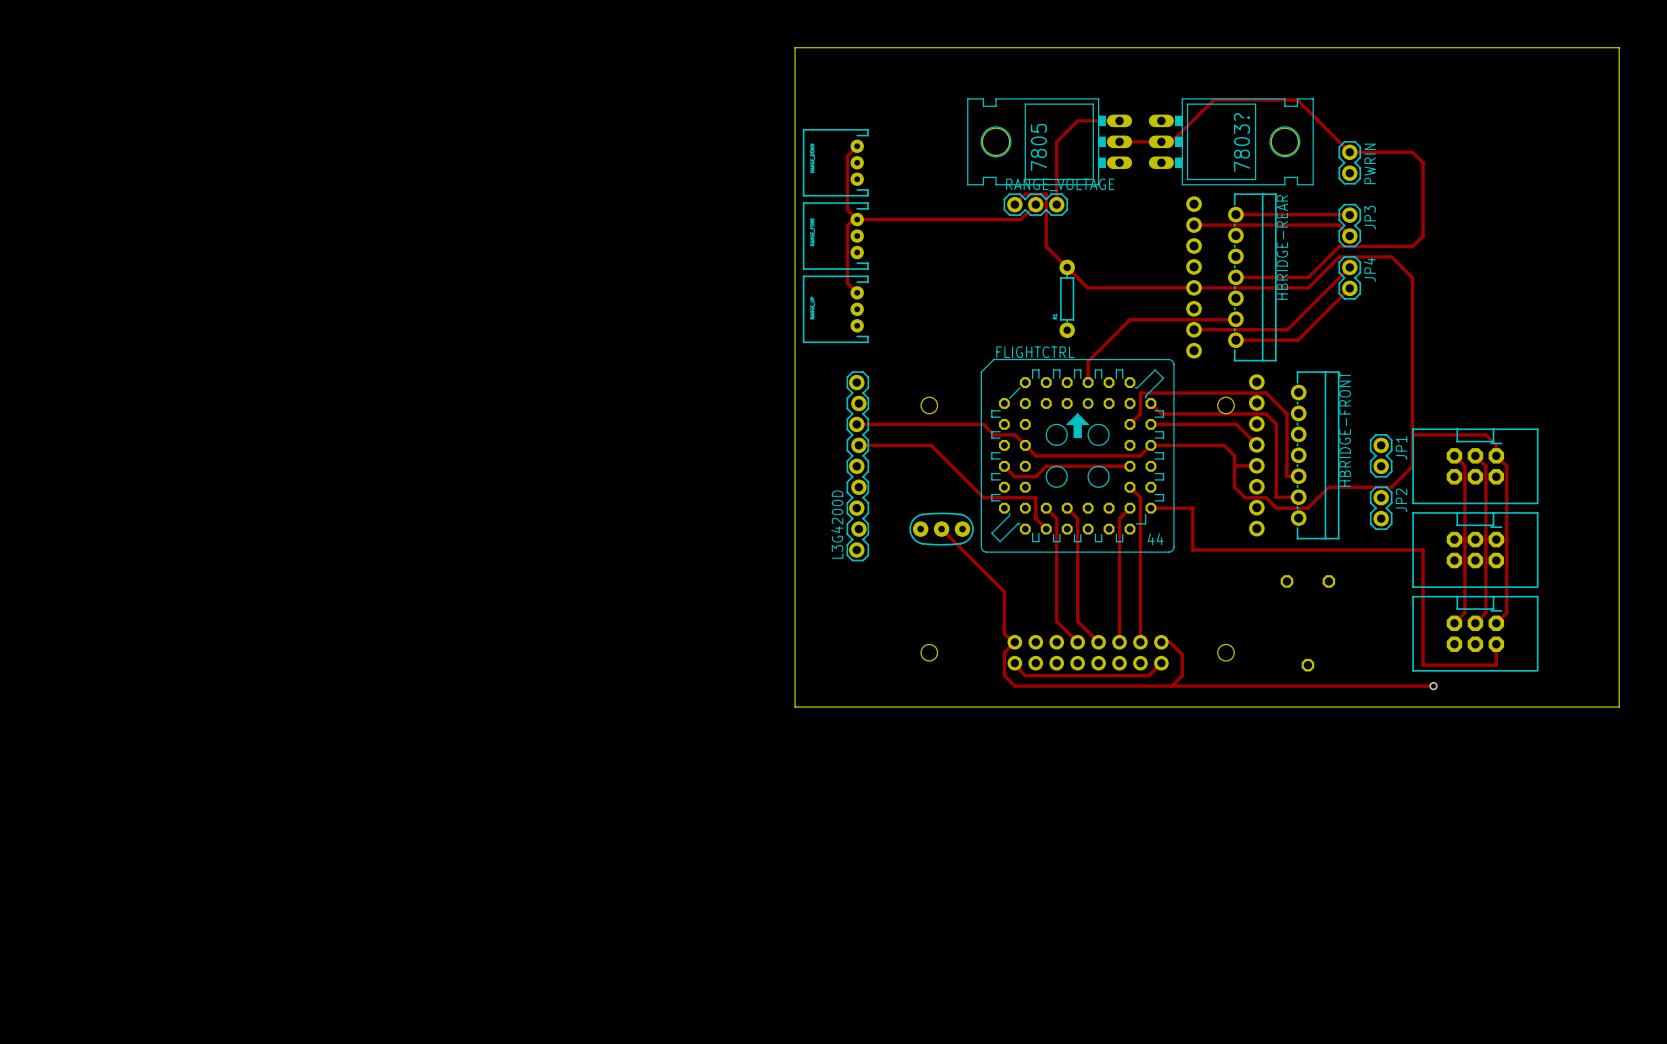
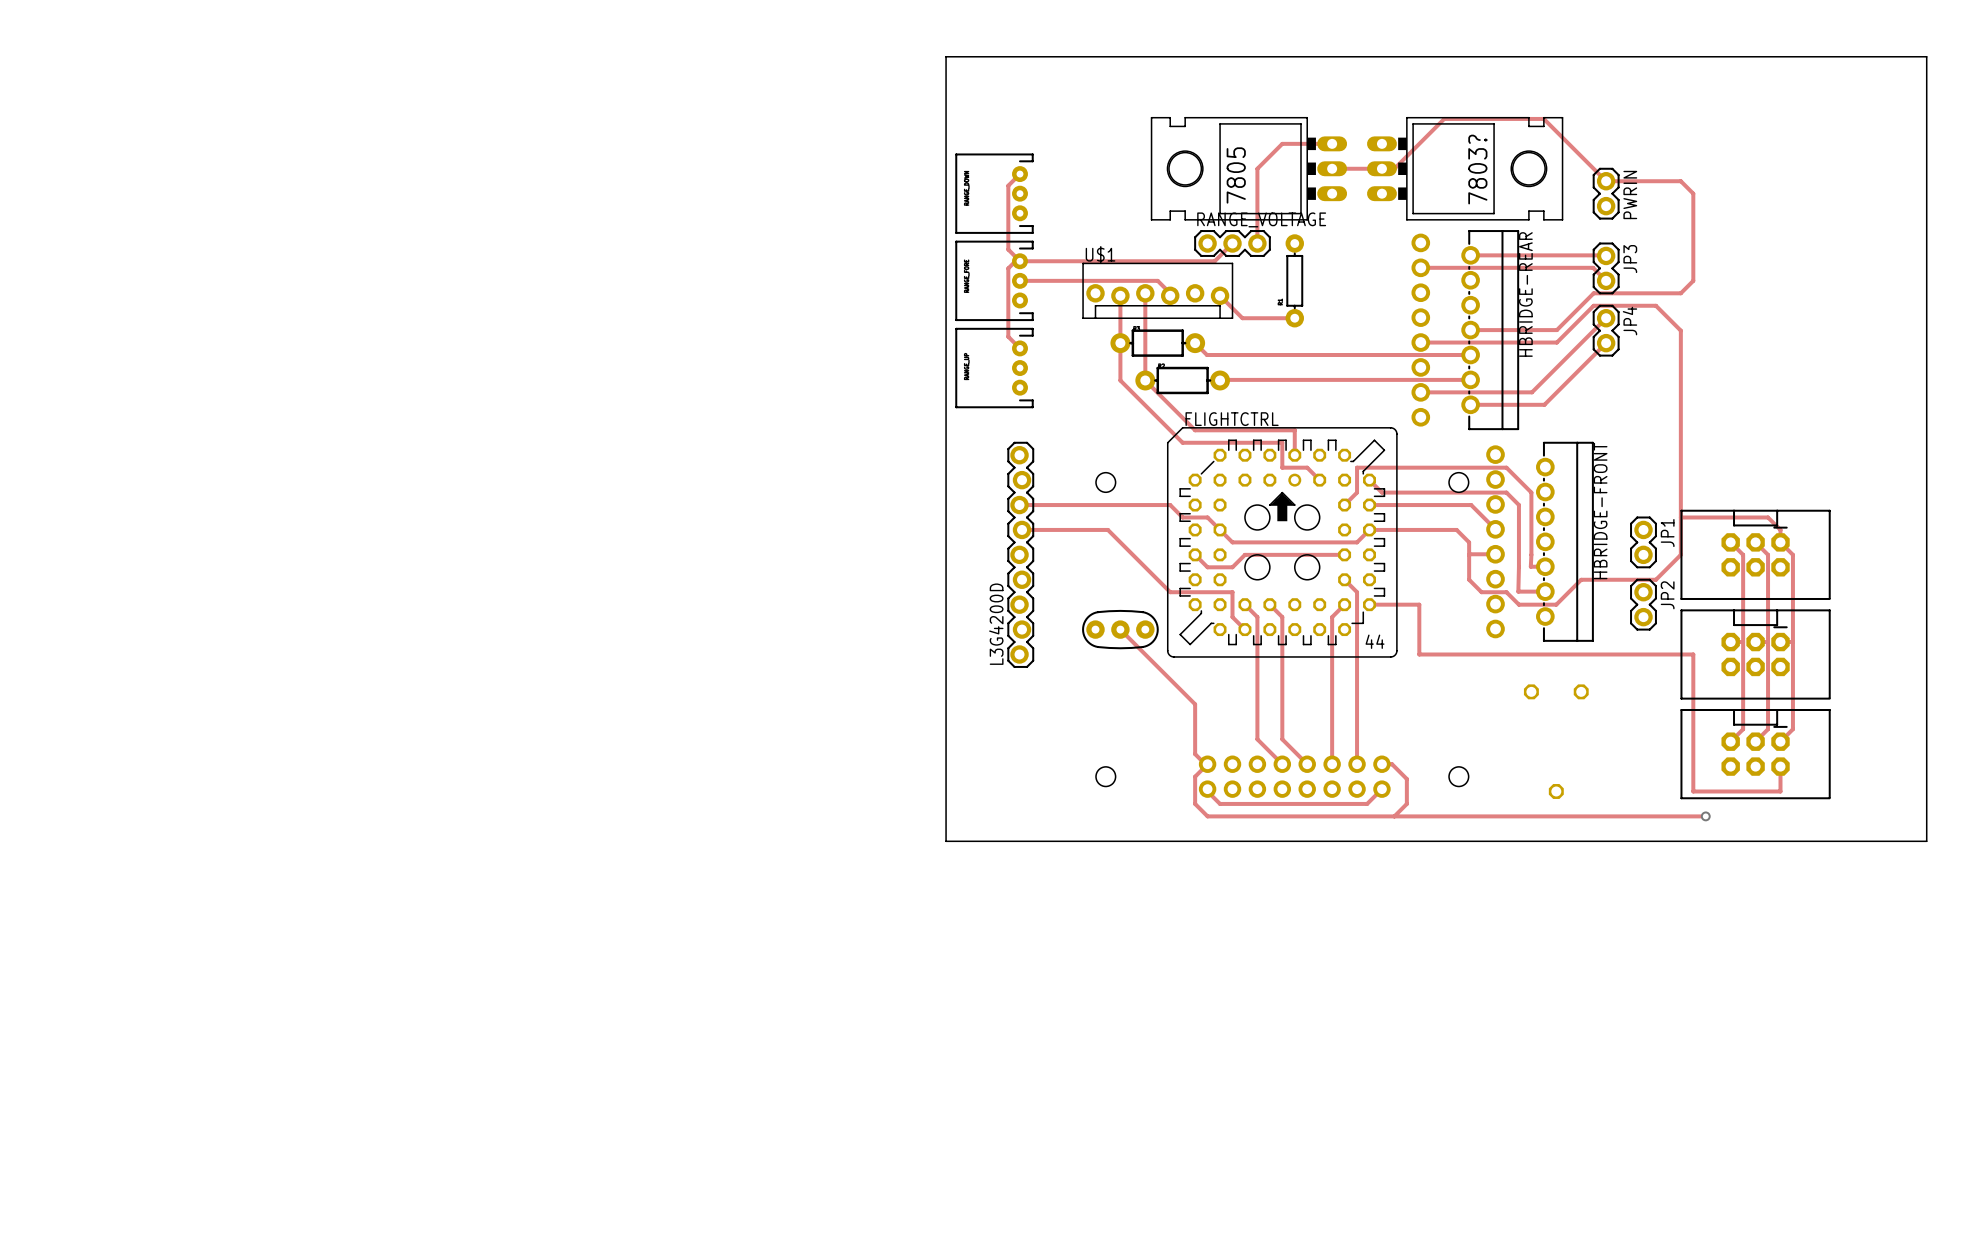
track: (1014, 204) (1025, 194) (1046, 194) (1046, 246) (1087, 287) (1194, 287) -> none
track: none -> (1019, 280) (1157, 280) (1170, 293) (1170, 295)
U$1: none -> (1157, 290)
track: none -> (1145, 293) (1145, 380) (1195, 430) (1294, 430)
track: none -> (1120, 295) (1120, 380) (1182, 442) (1282, 442) (1282, 467) (1307, 467) (1319, 480)
track: none -> (1220, 295) (1242, 318) (1294, 318)
part: none -> (1157, 343)
track: none -> (1195, 343) (1207, 354) (1470, 354)
part position: (1067, 298) -> (1294, 280)
part: none -> (1182, 380)
track: (1235, 319) (1129, 319) (1088, 361) -> (1470, 379) (1220, 380)

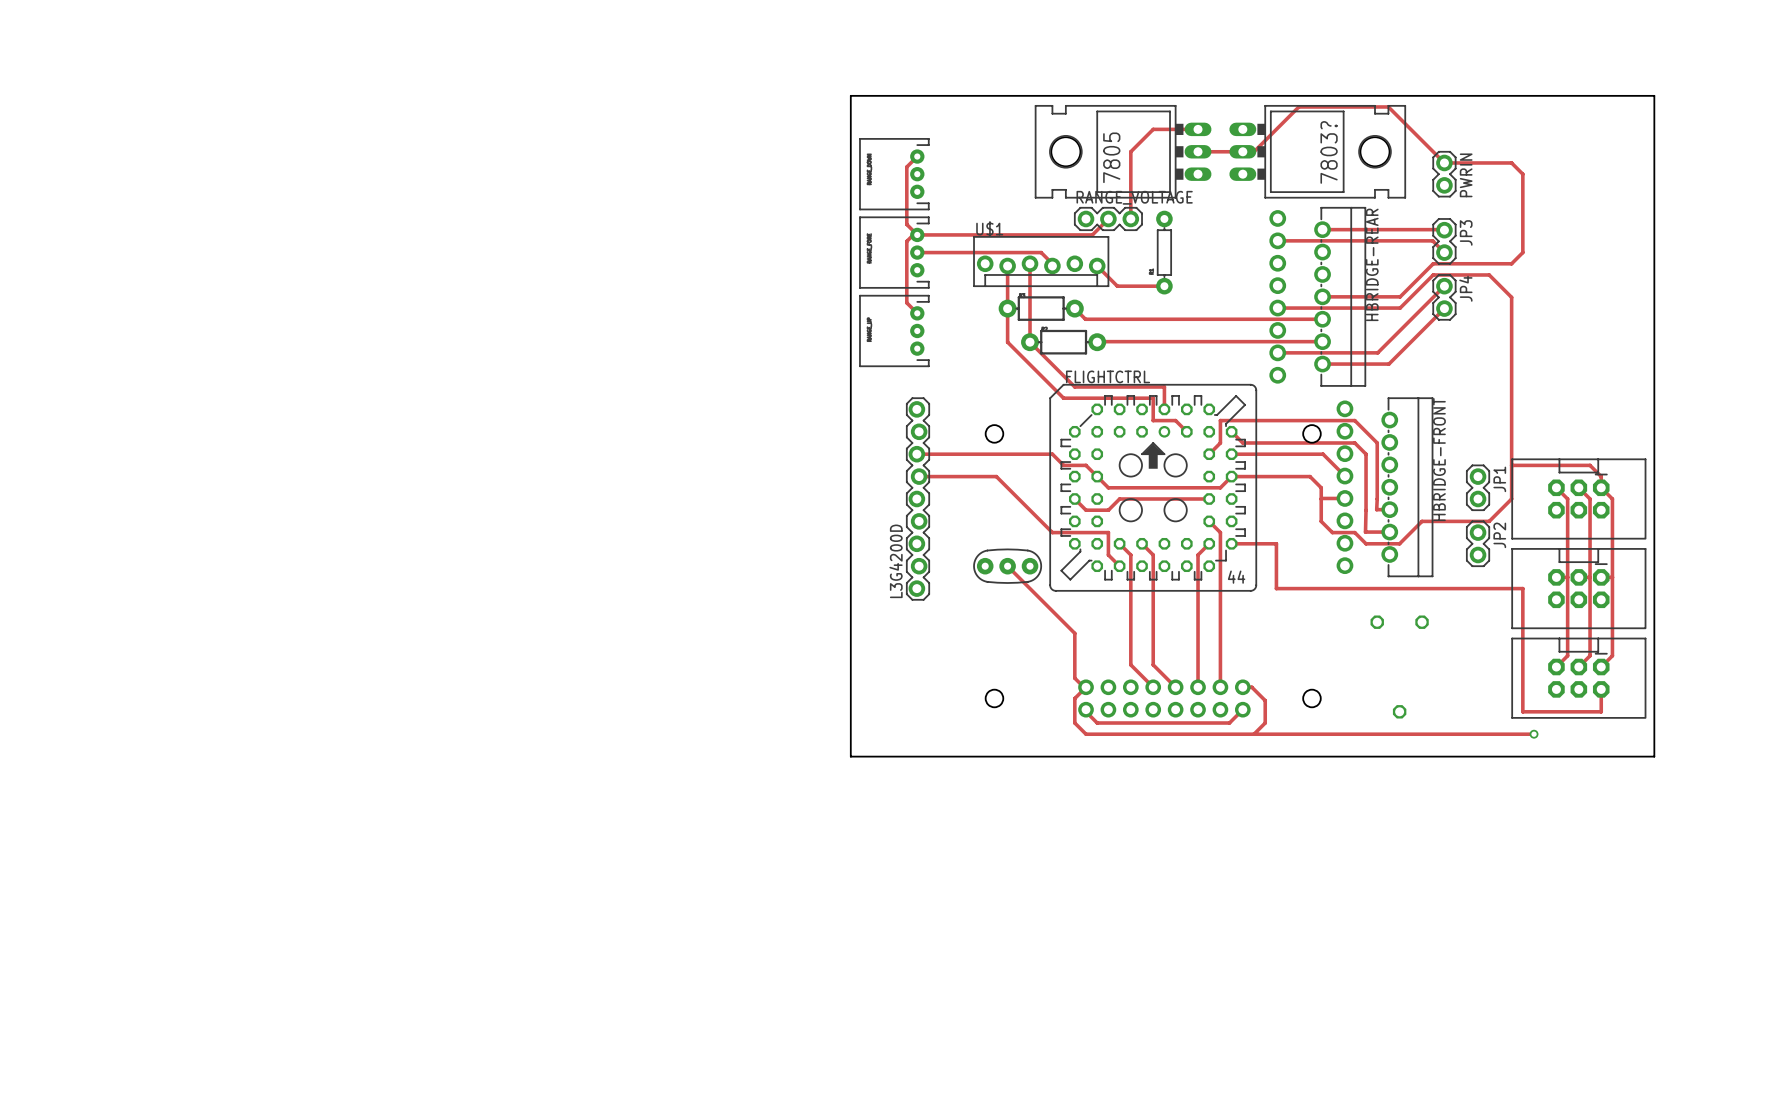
board edge: (946, 106) (946, 56) (1926, 56) (1926, 841) (1839, 841) -> (850, 95) (1654, 95) (1654, 756)

